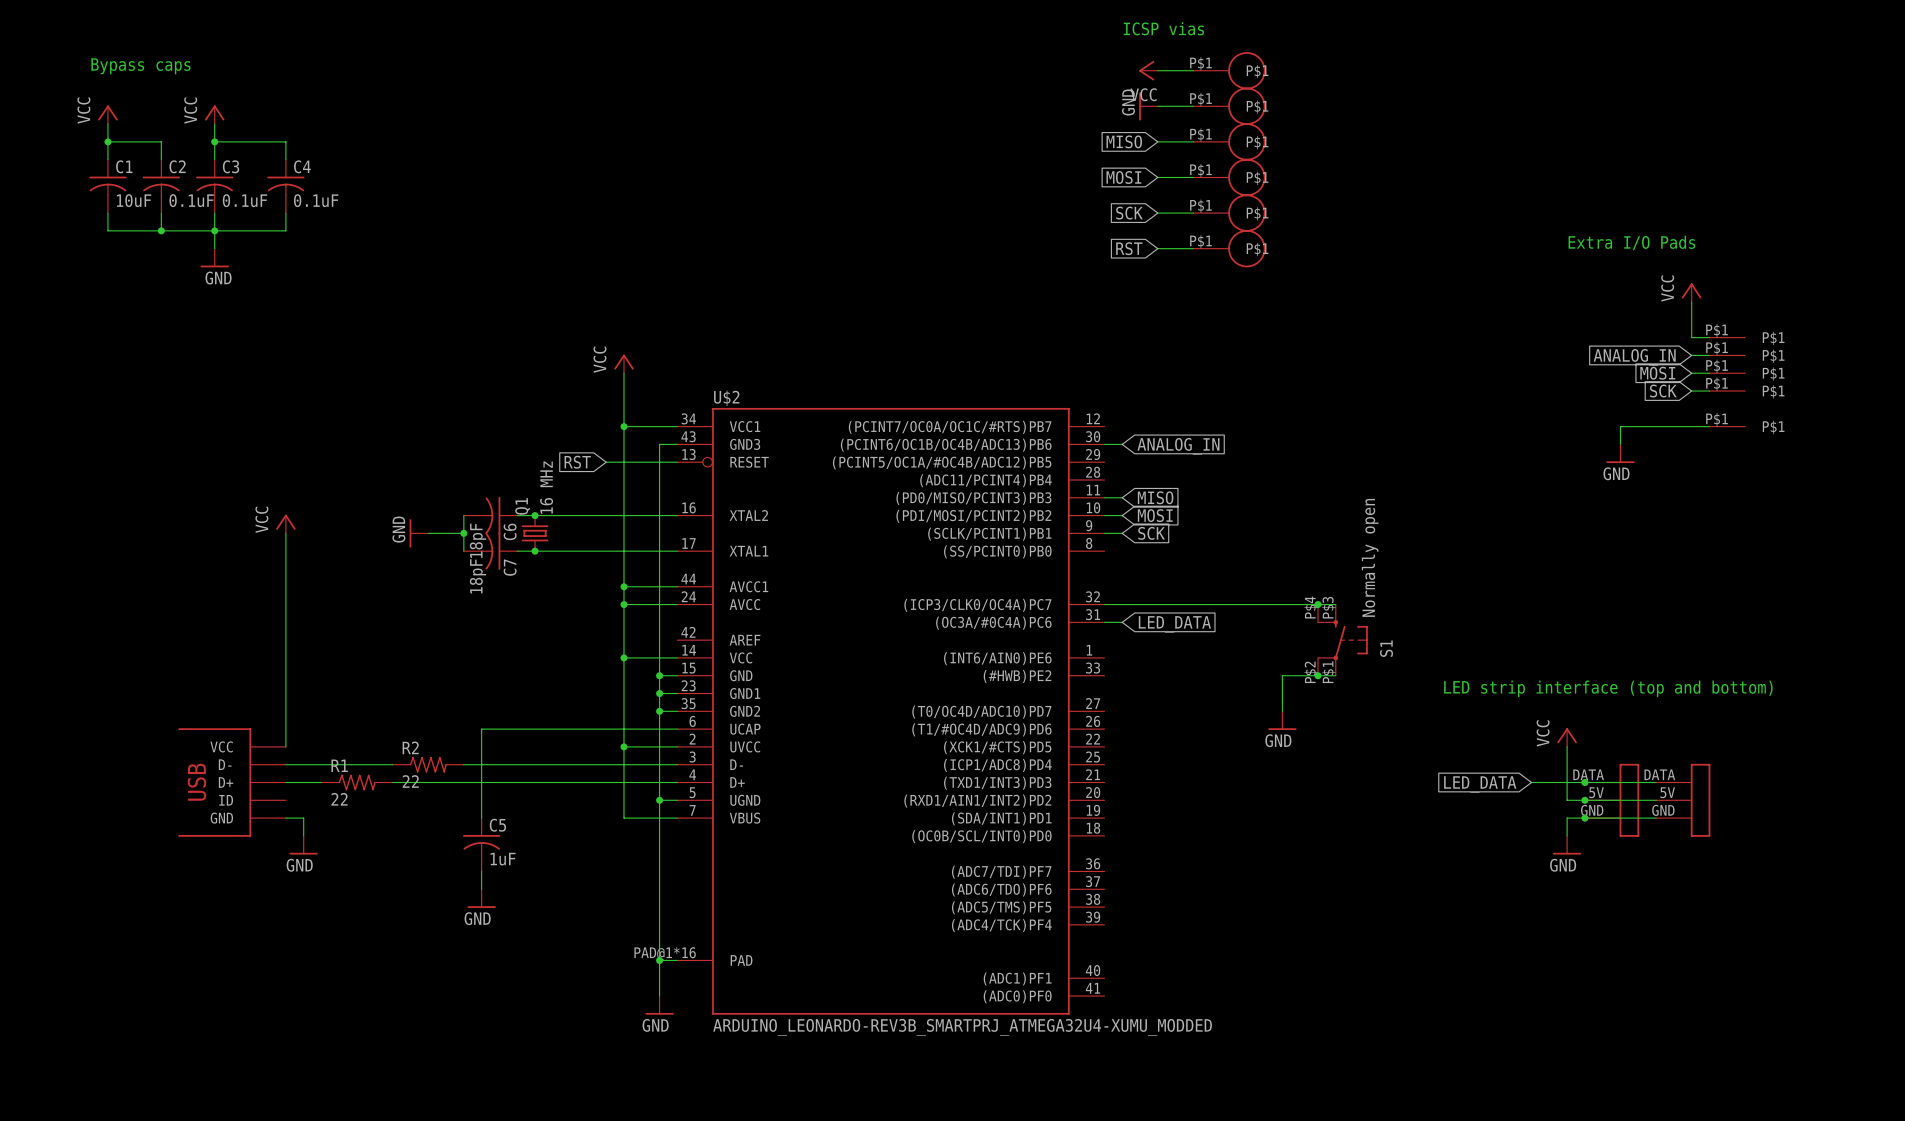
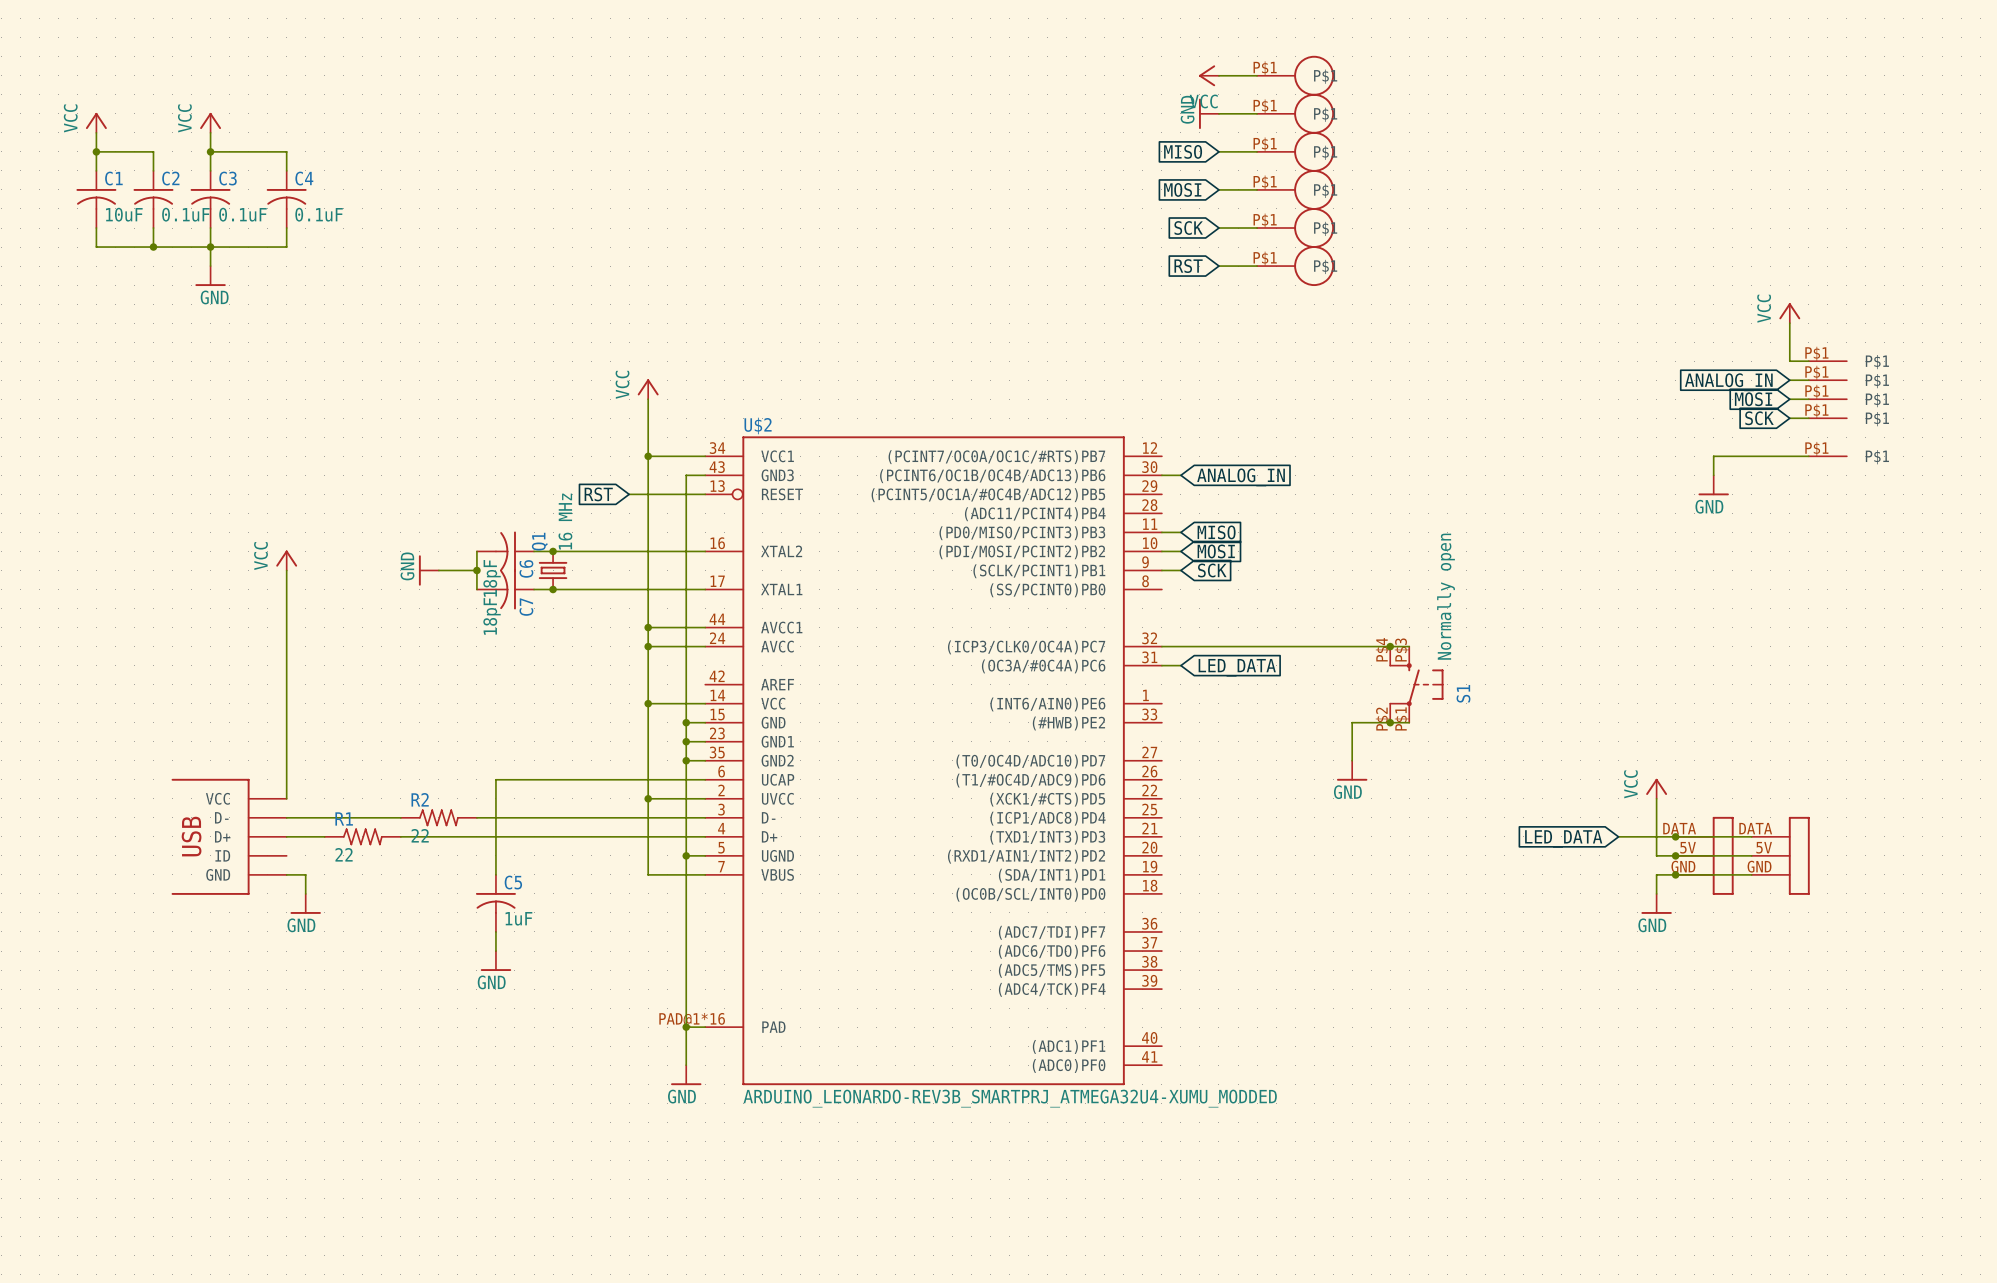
text: ICSP vias (1163, 28) -> none
text: Bypass caps (140, 66) -> none
text: Extra I/O Pads (1631, 242) -> none
text: LED strip interface (top and bottom) (1608, 688) -> none

